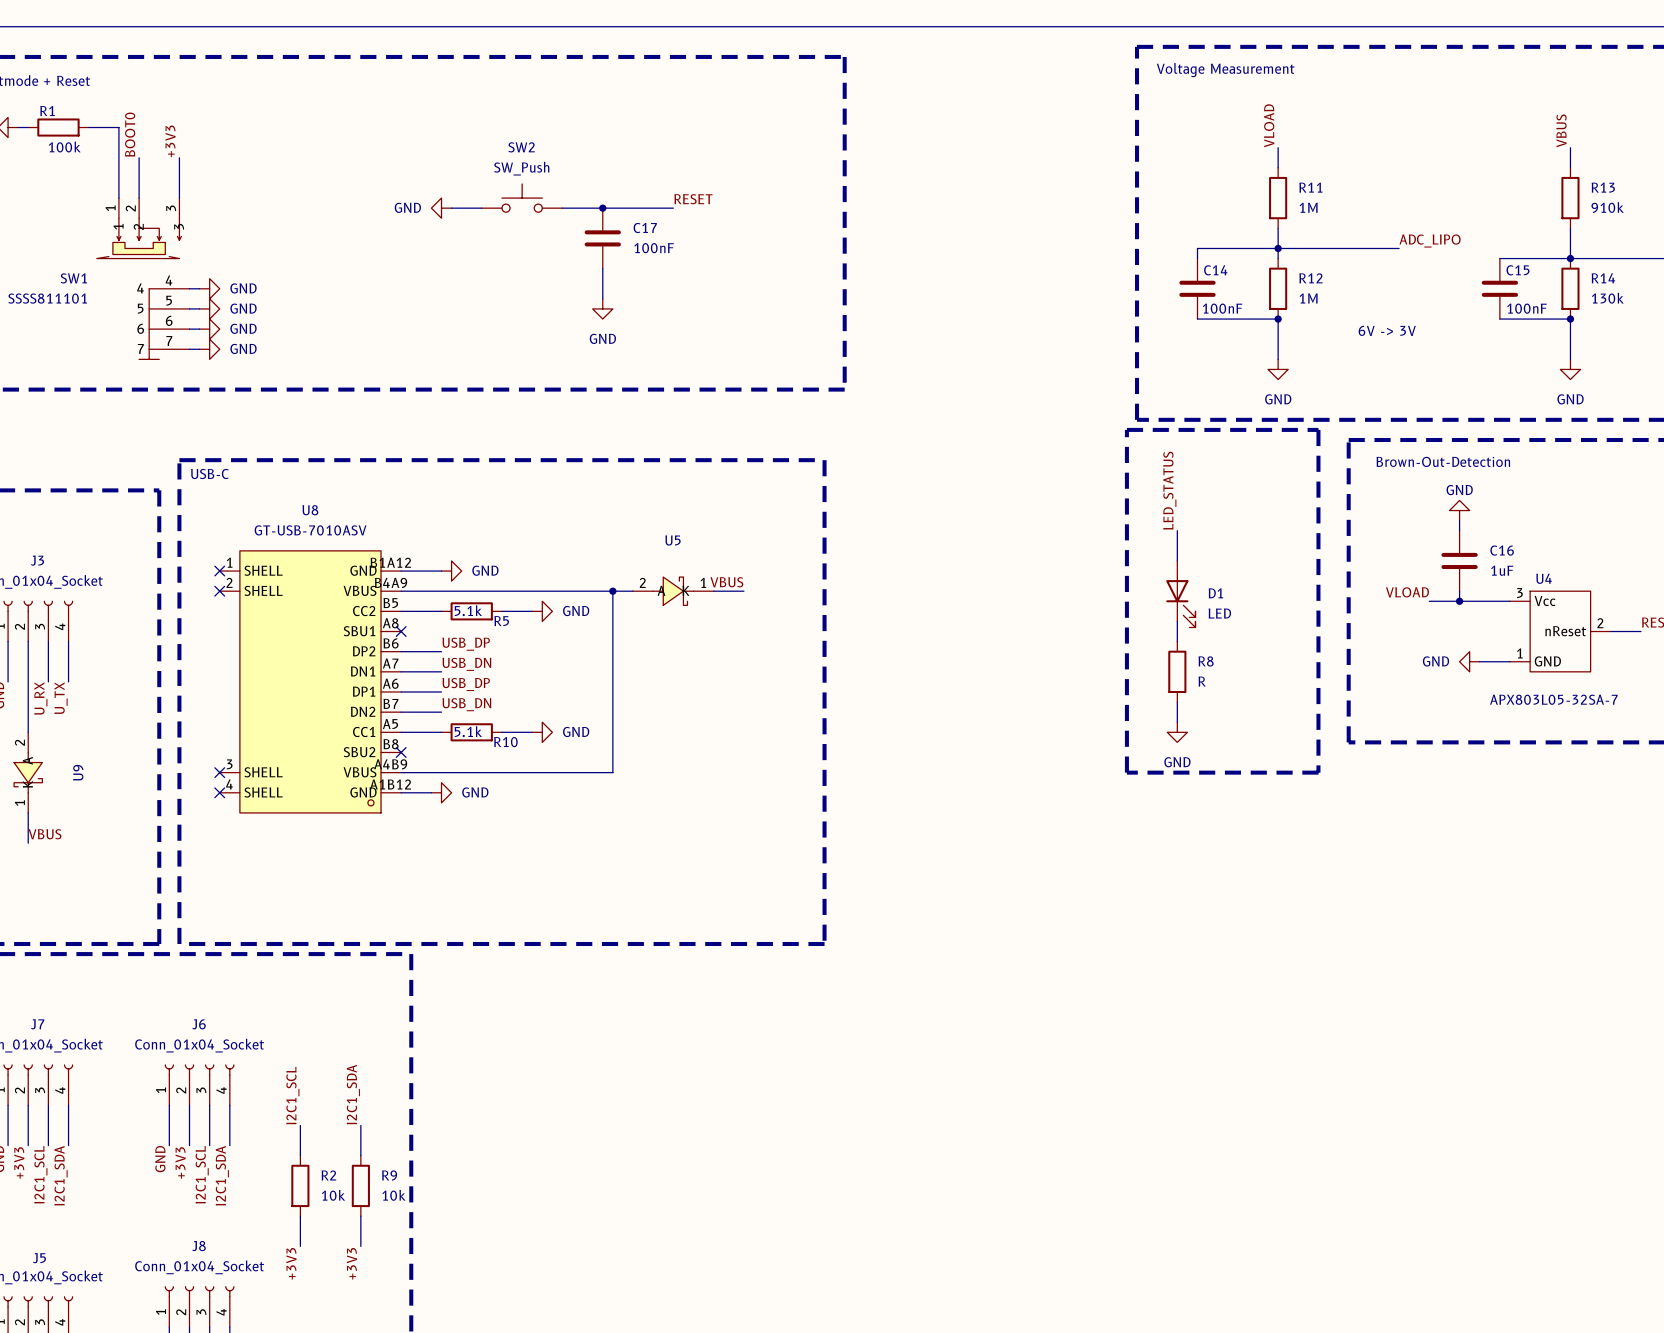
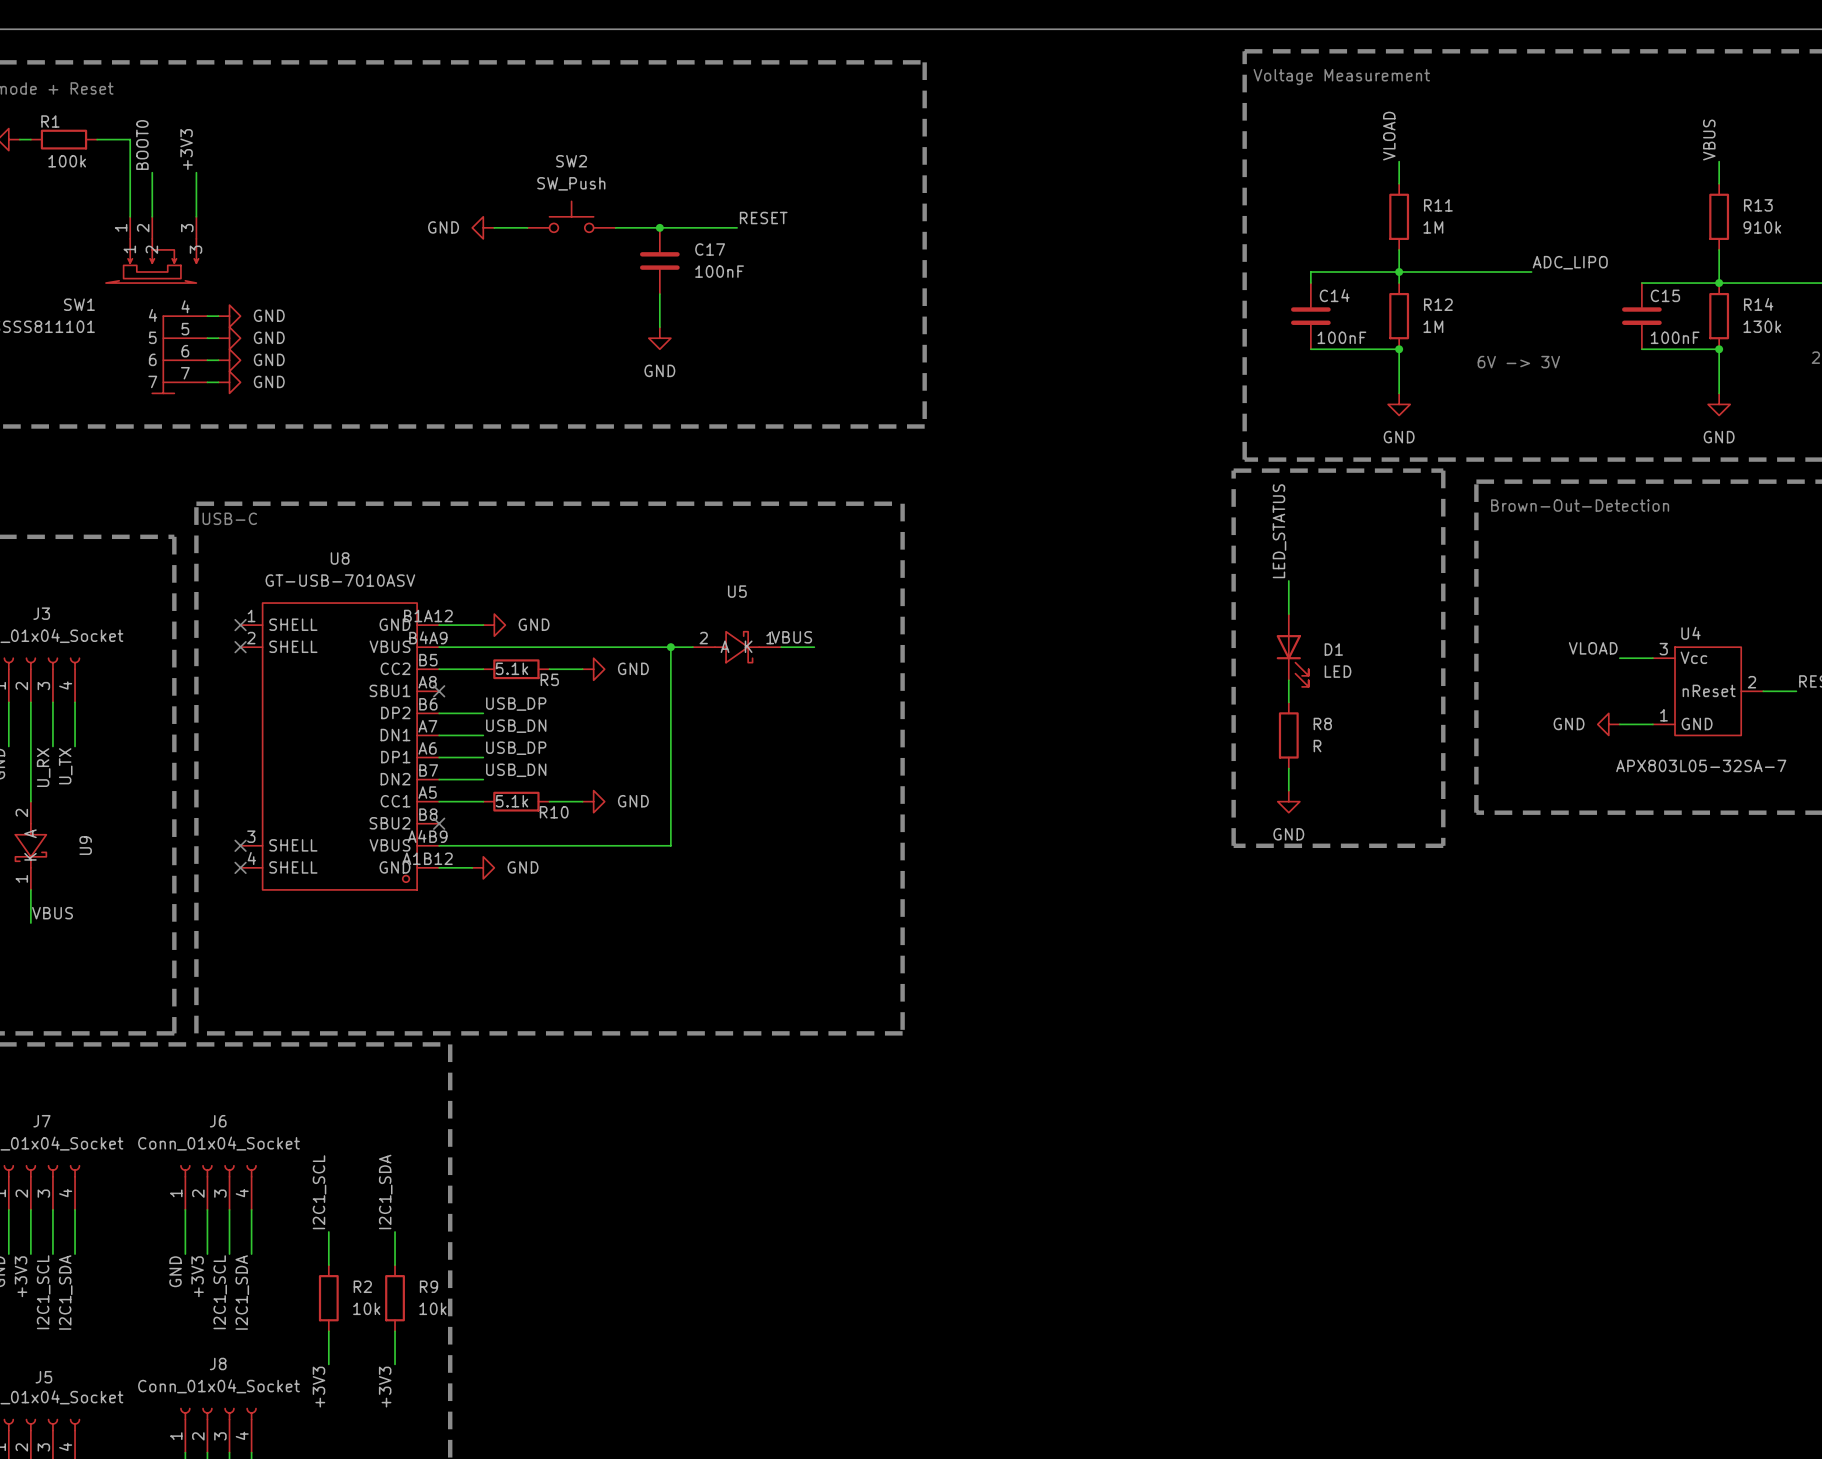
power symbol: GND (1459, 510) -> none
wire: (1459, 520) (1459, 530) -> none
C16: 1uF (1459, 560) -> none
wire: (1459, 591) (1459, 601) -> none
label position: VLOAD (1407, 592) -> VLOAD (1593, 648)
wire: (1429, 601) (1479, 601) -> none
junction: (1459, 601) -> none

